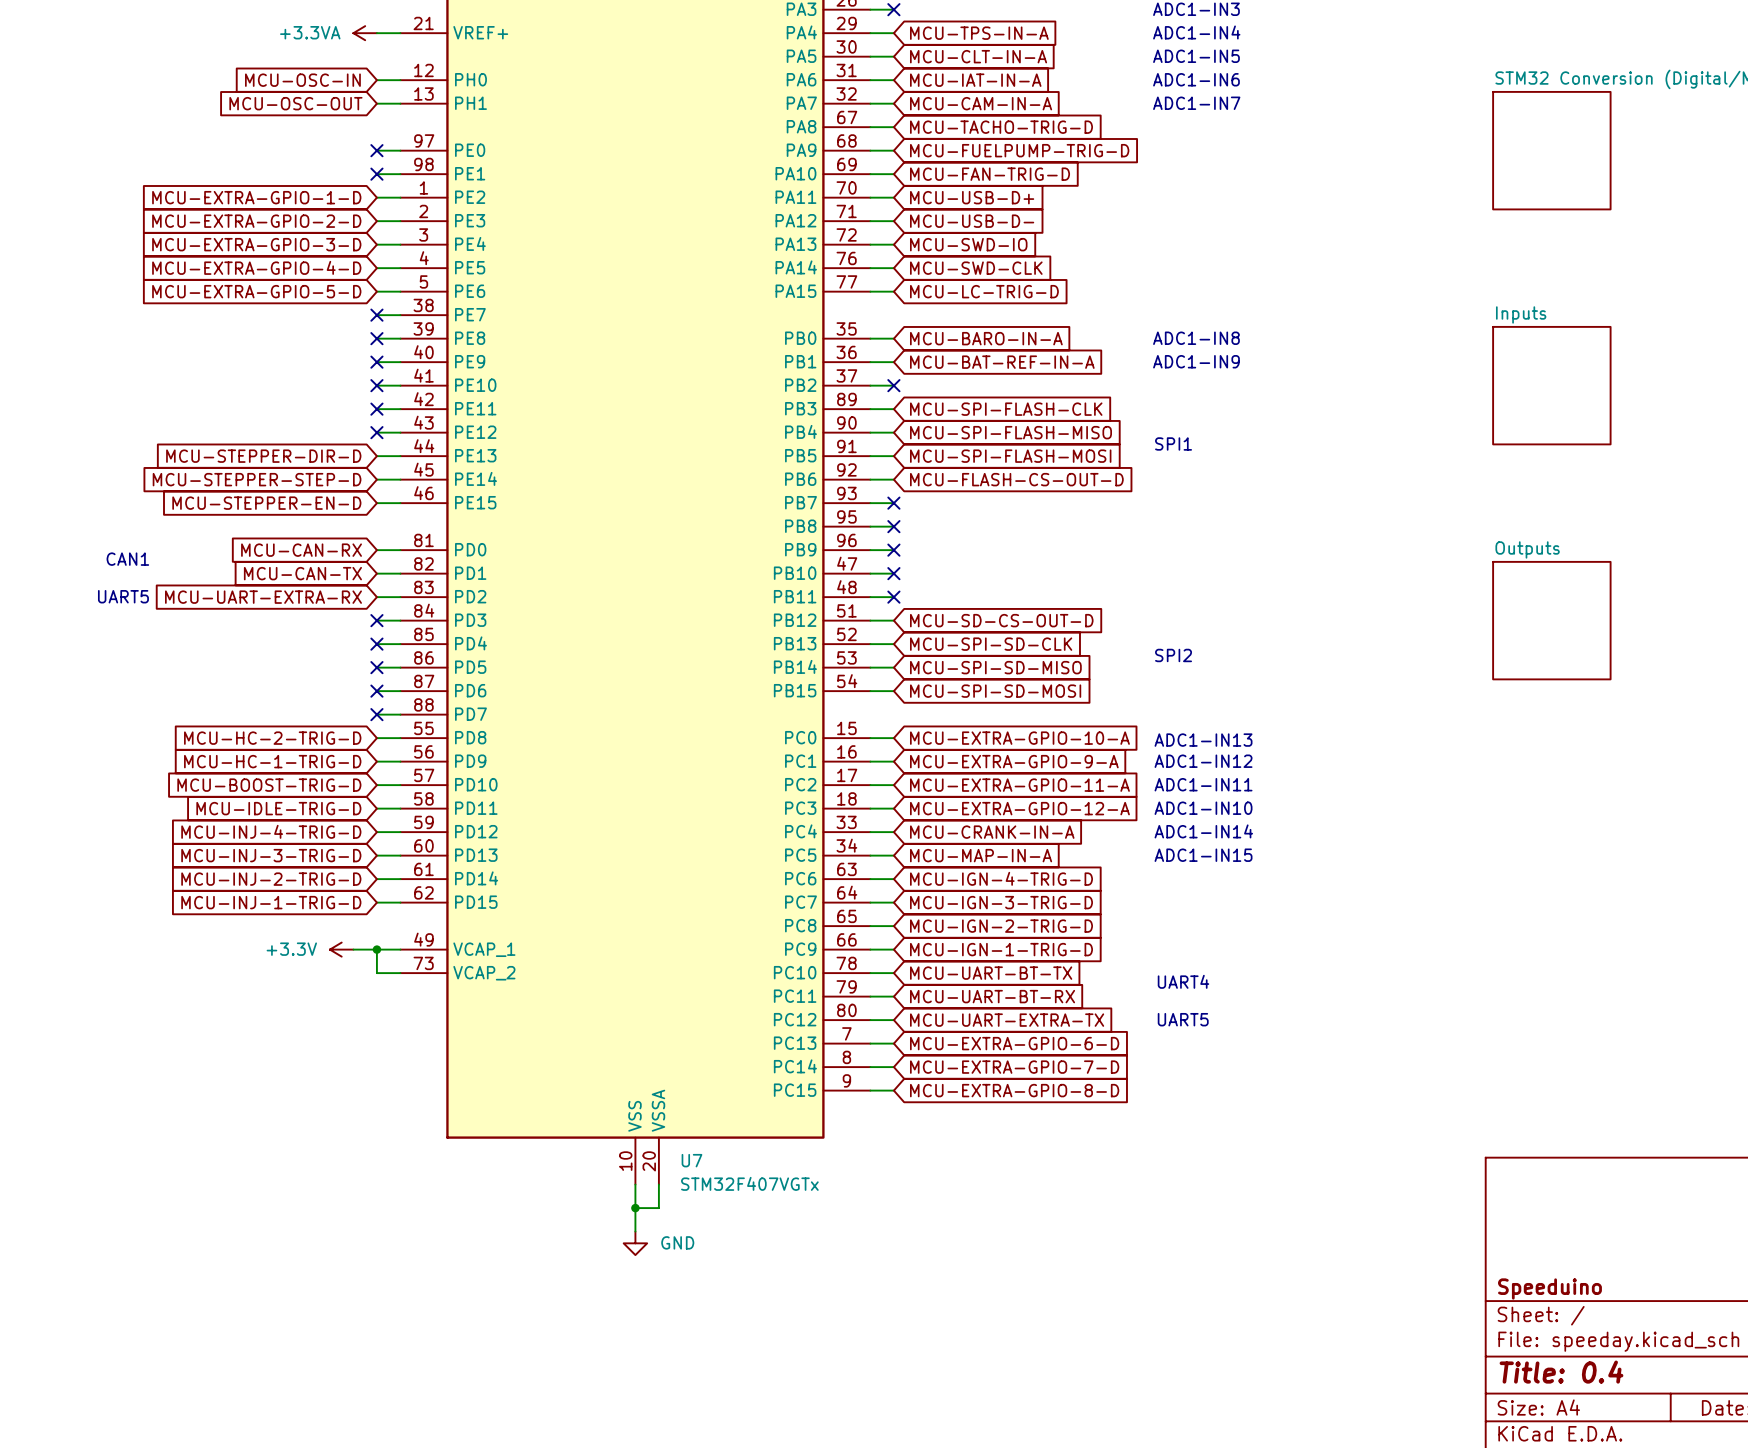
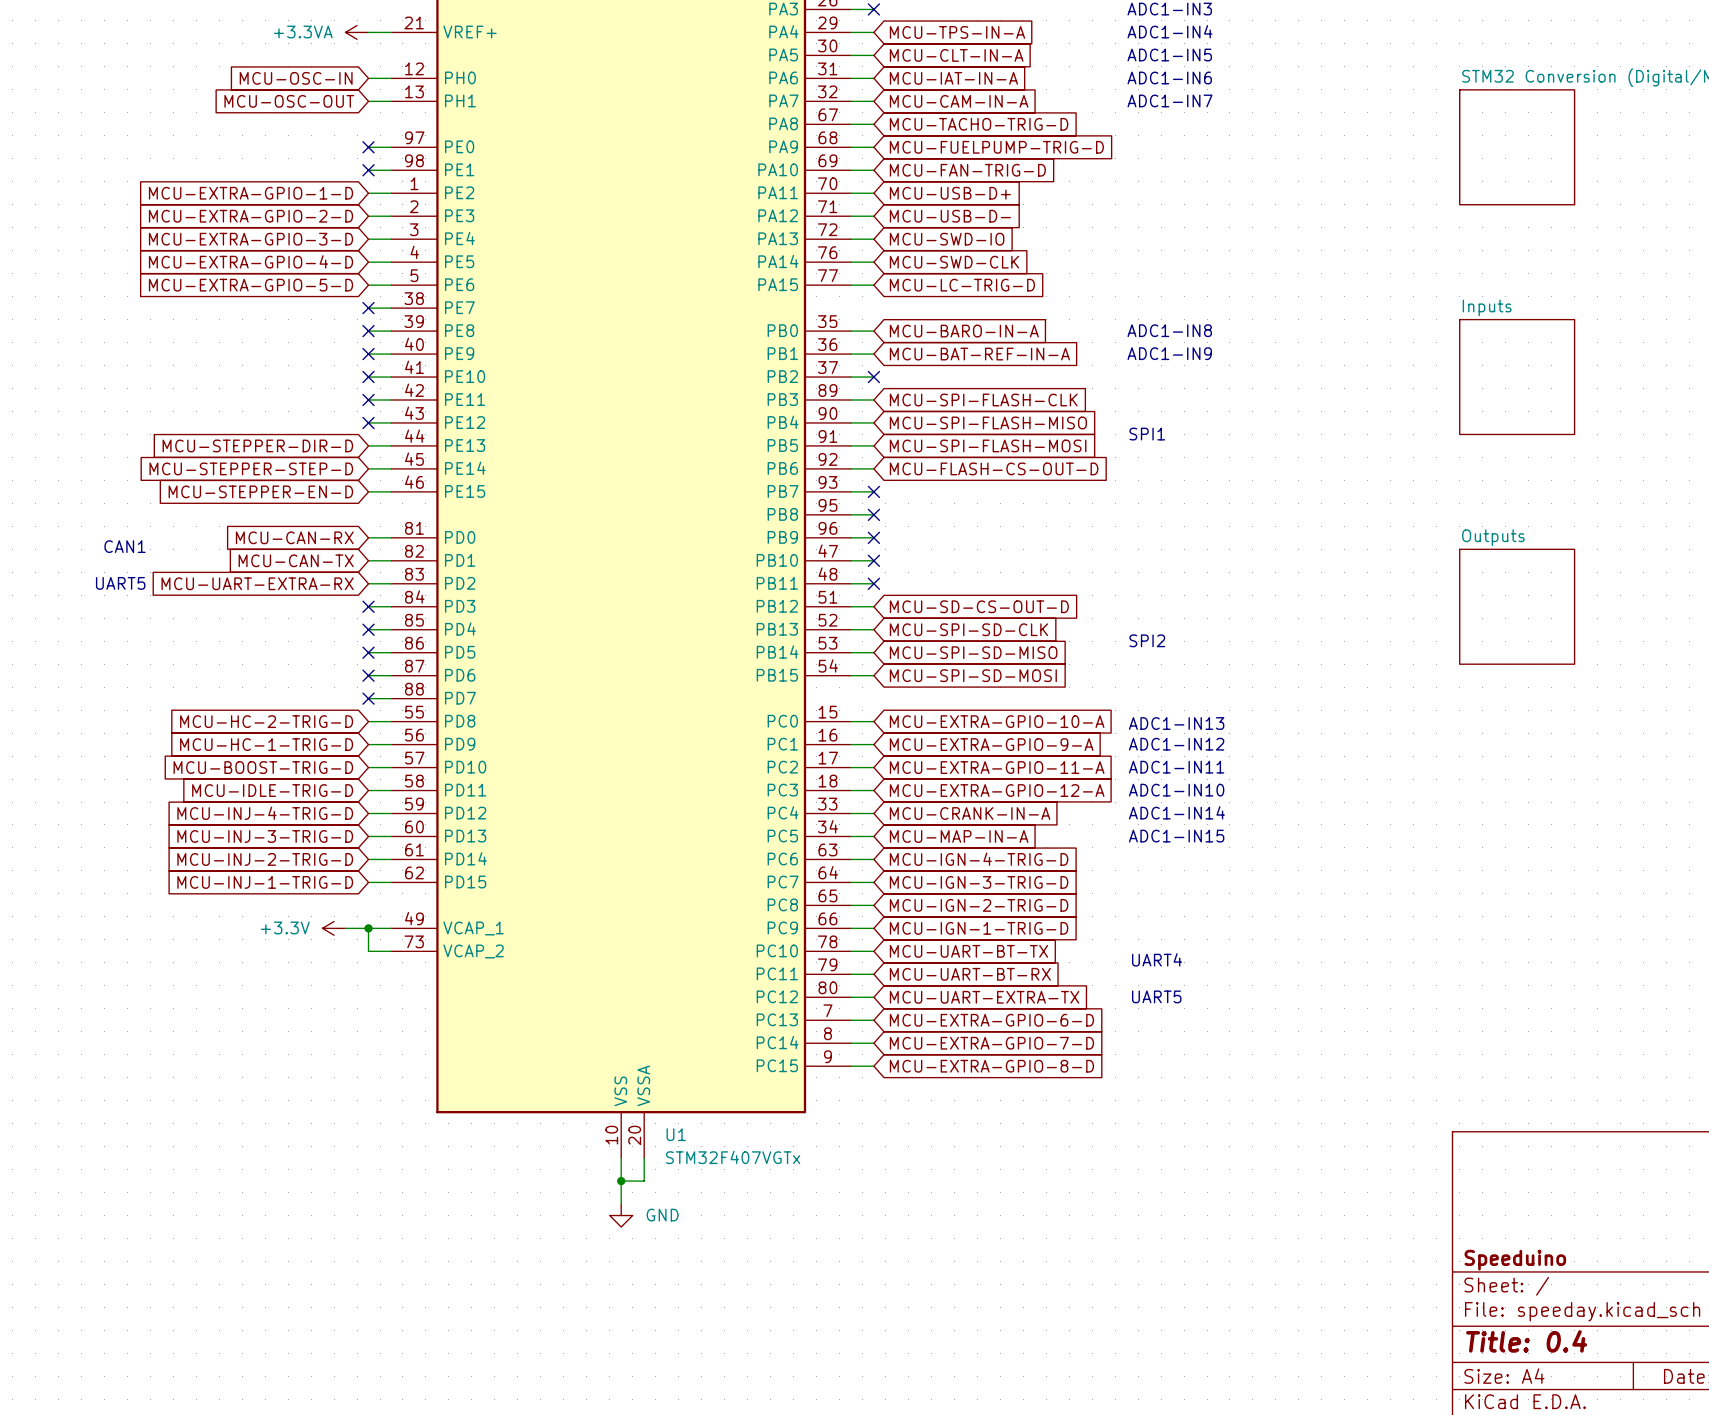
U7 name: U7 (691, 1160) -> U1 (676, 1134)

